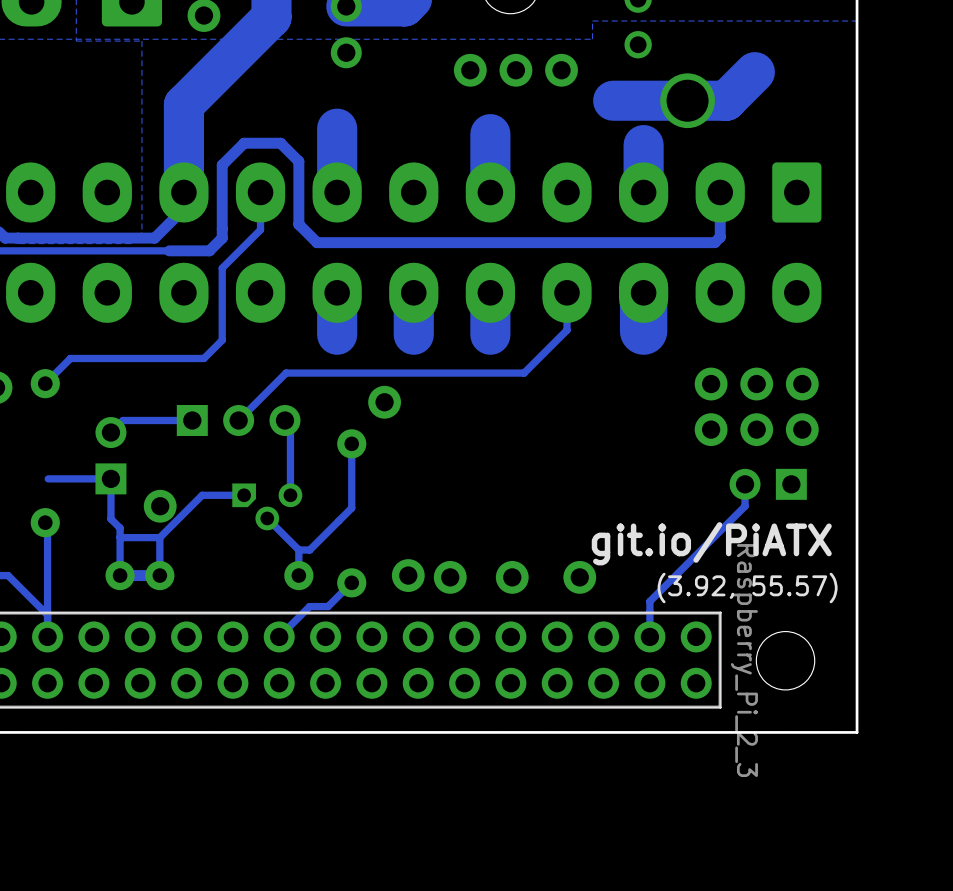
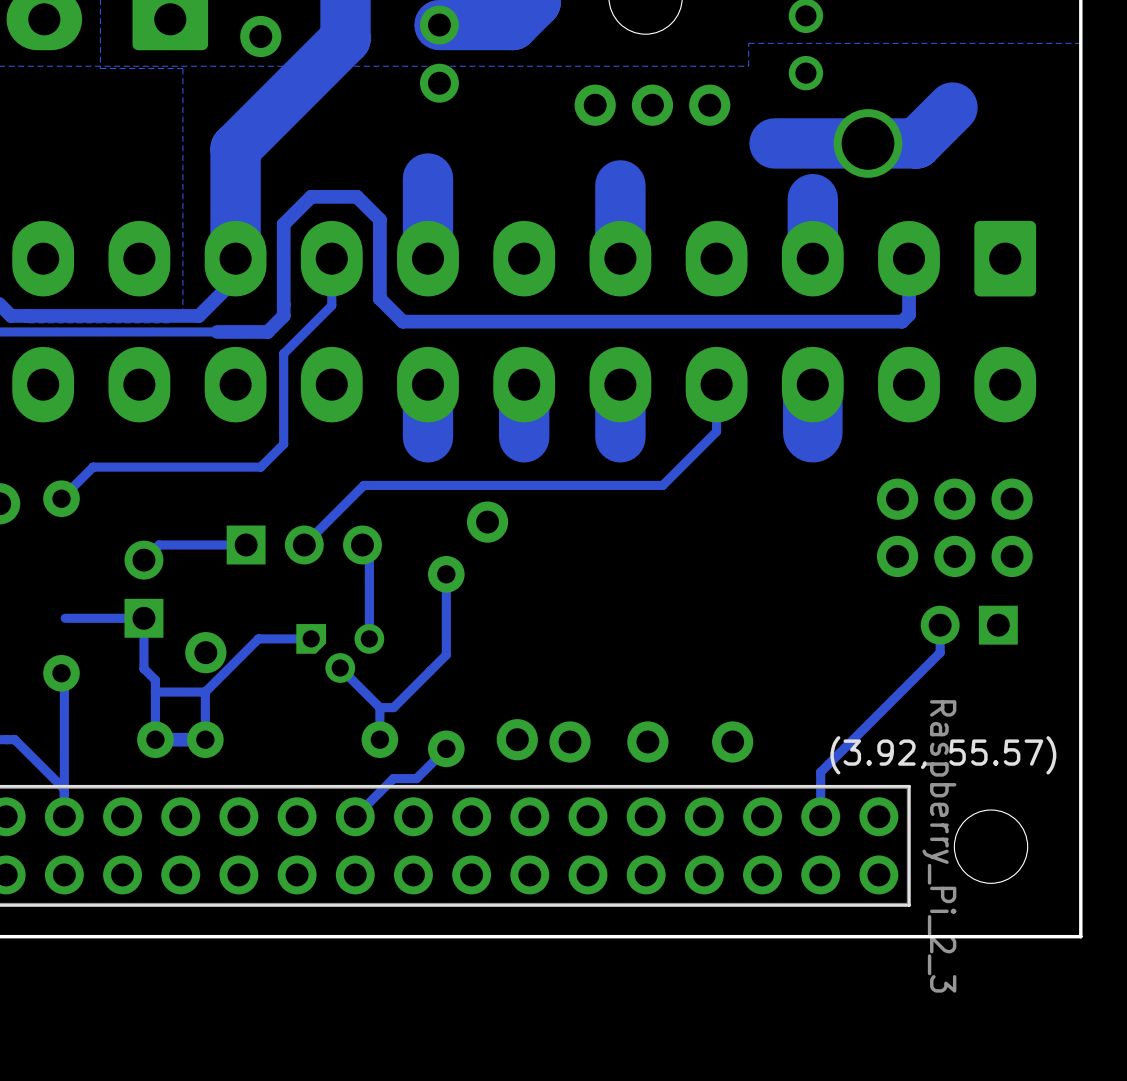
text: git.io/PiATX (711, 543) -> none

